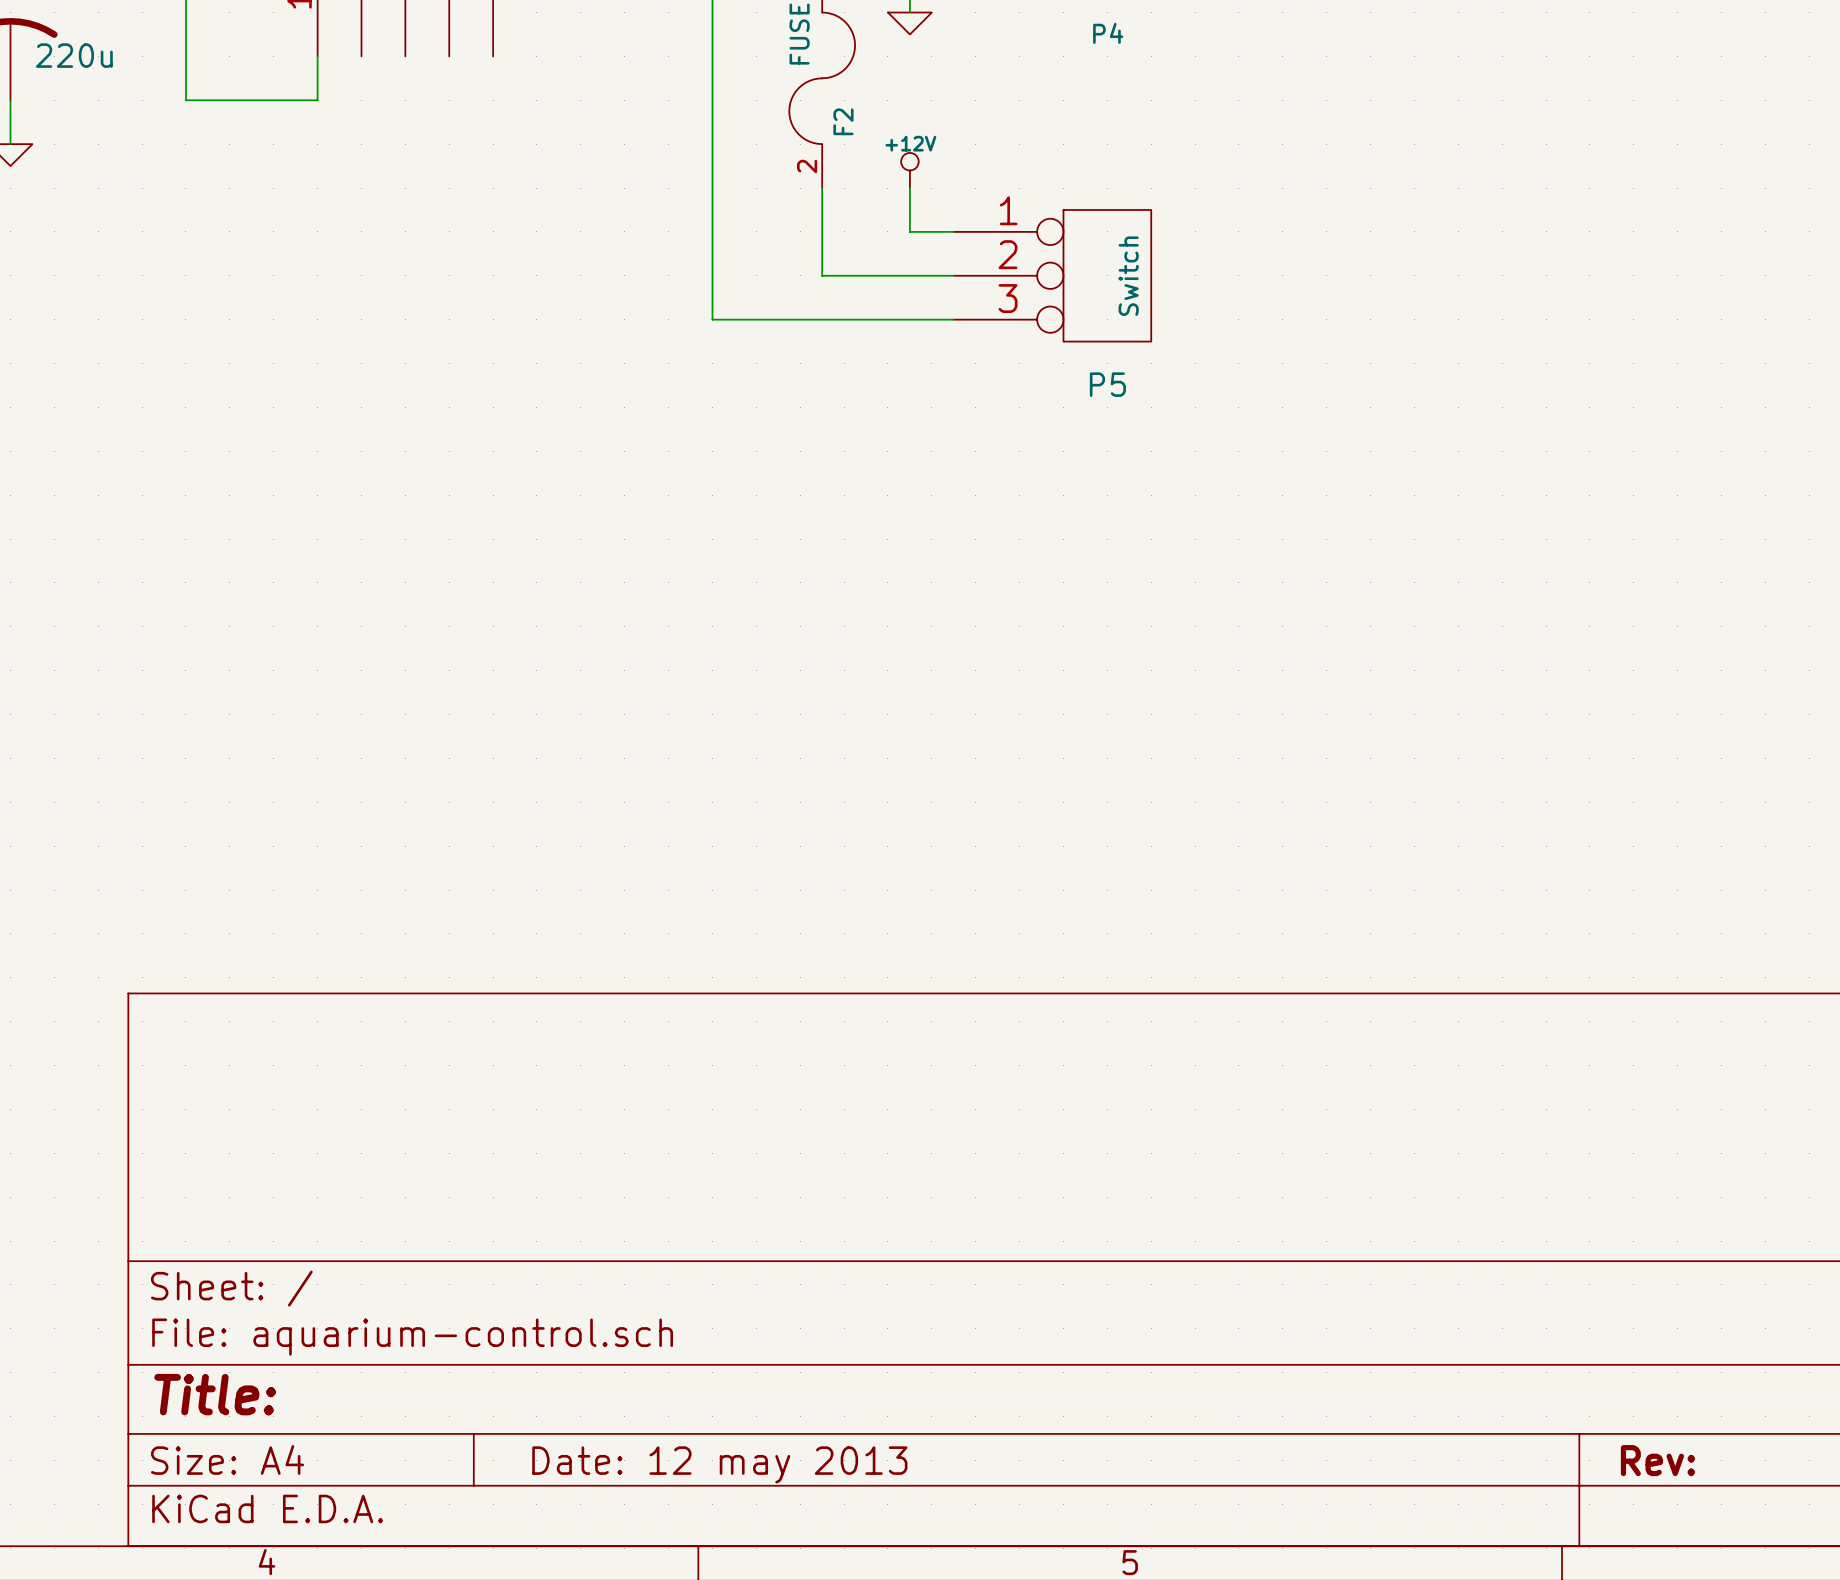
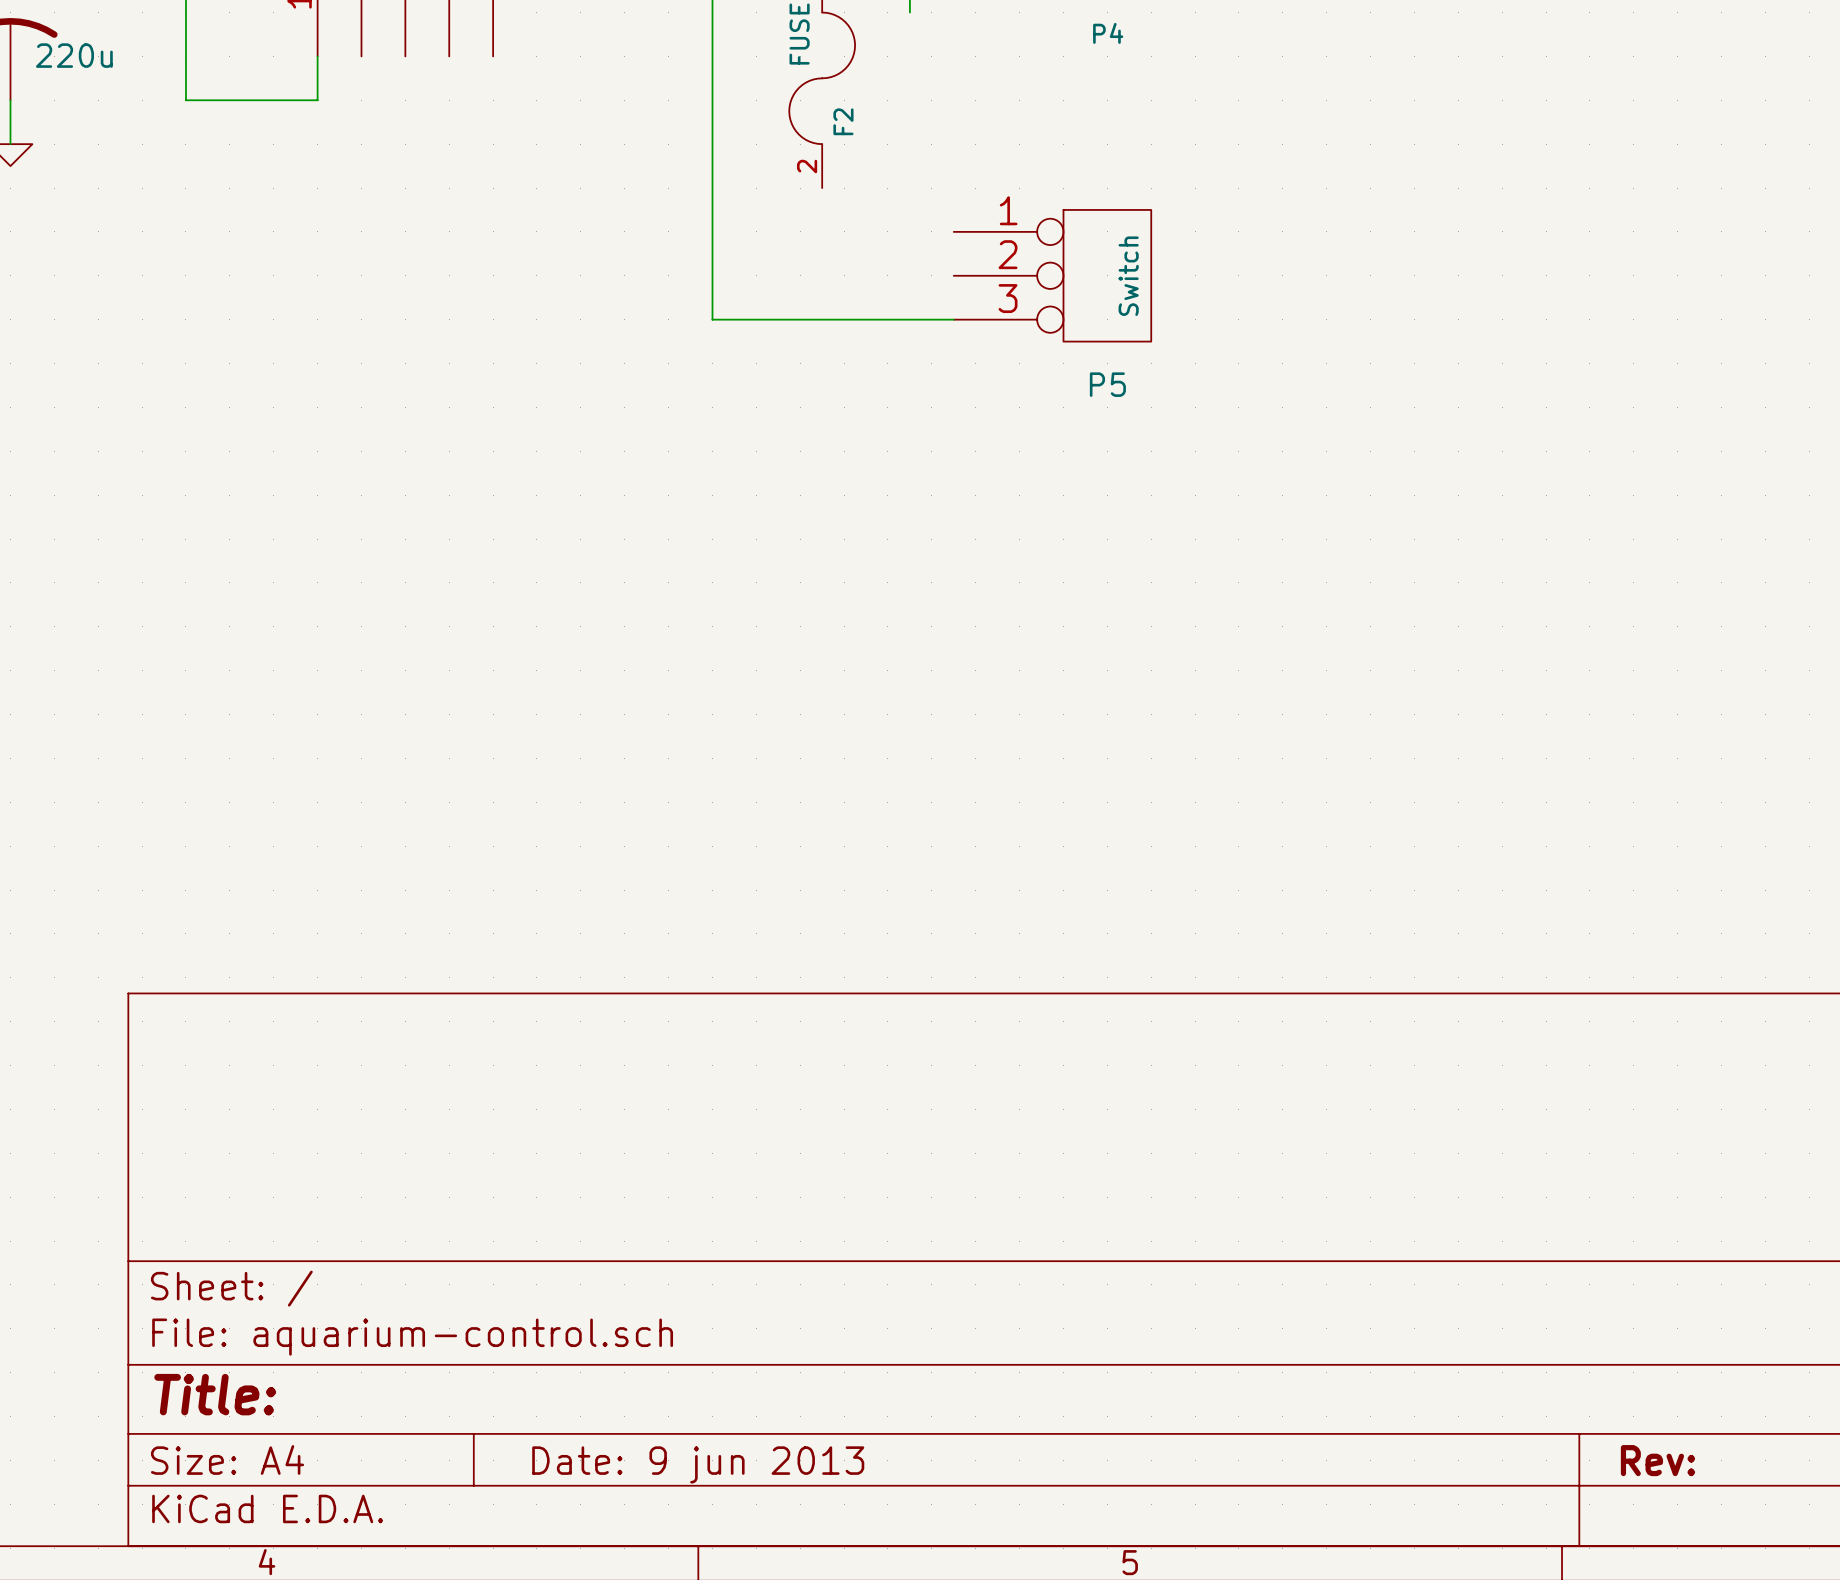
power symbol: (909, 23) -> none
power symbol: +12V (909, 170) -> none
wire: (822, 188) (822, 275) (953, 275) -> none
wire: (909, 188) (909, 231) (953, 231) -> none
title block: Date: 12 may 2013 (719, 1464) -> Date: 9 jun 2013 (698, 1464)

